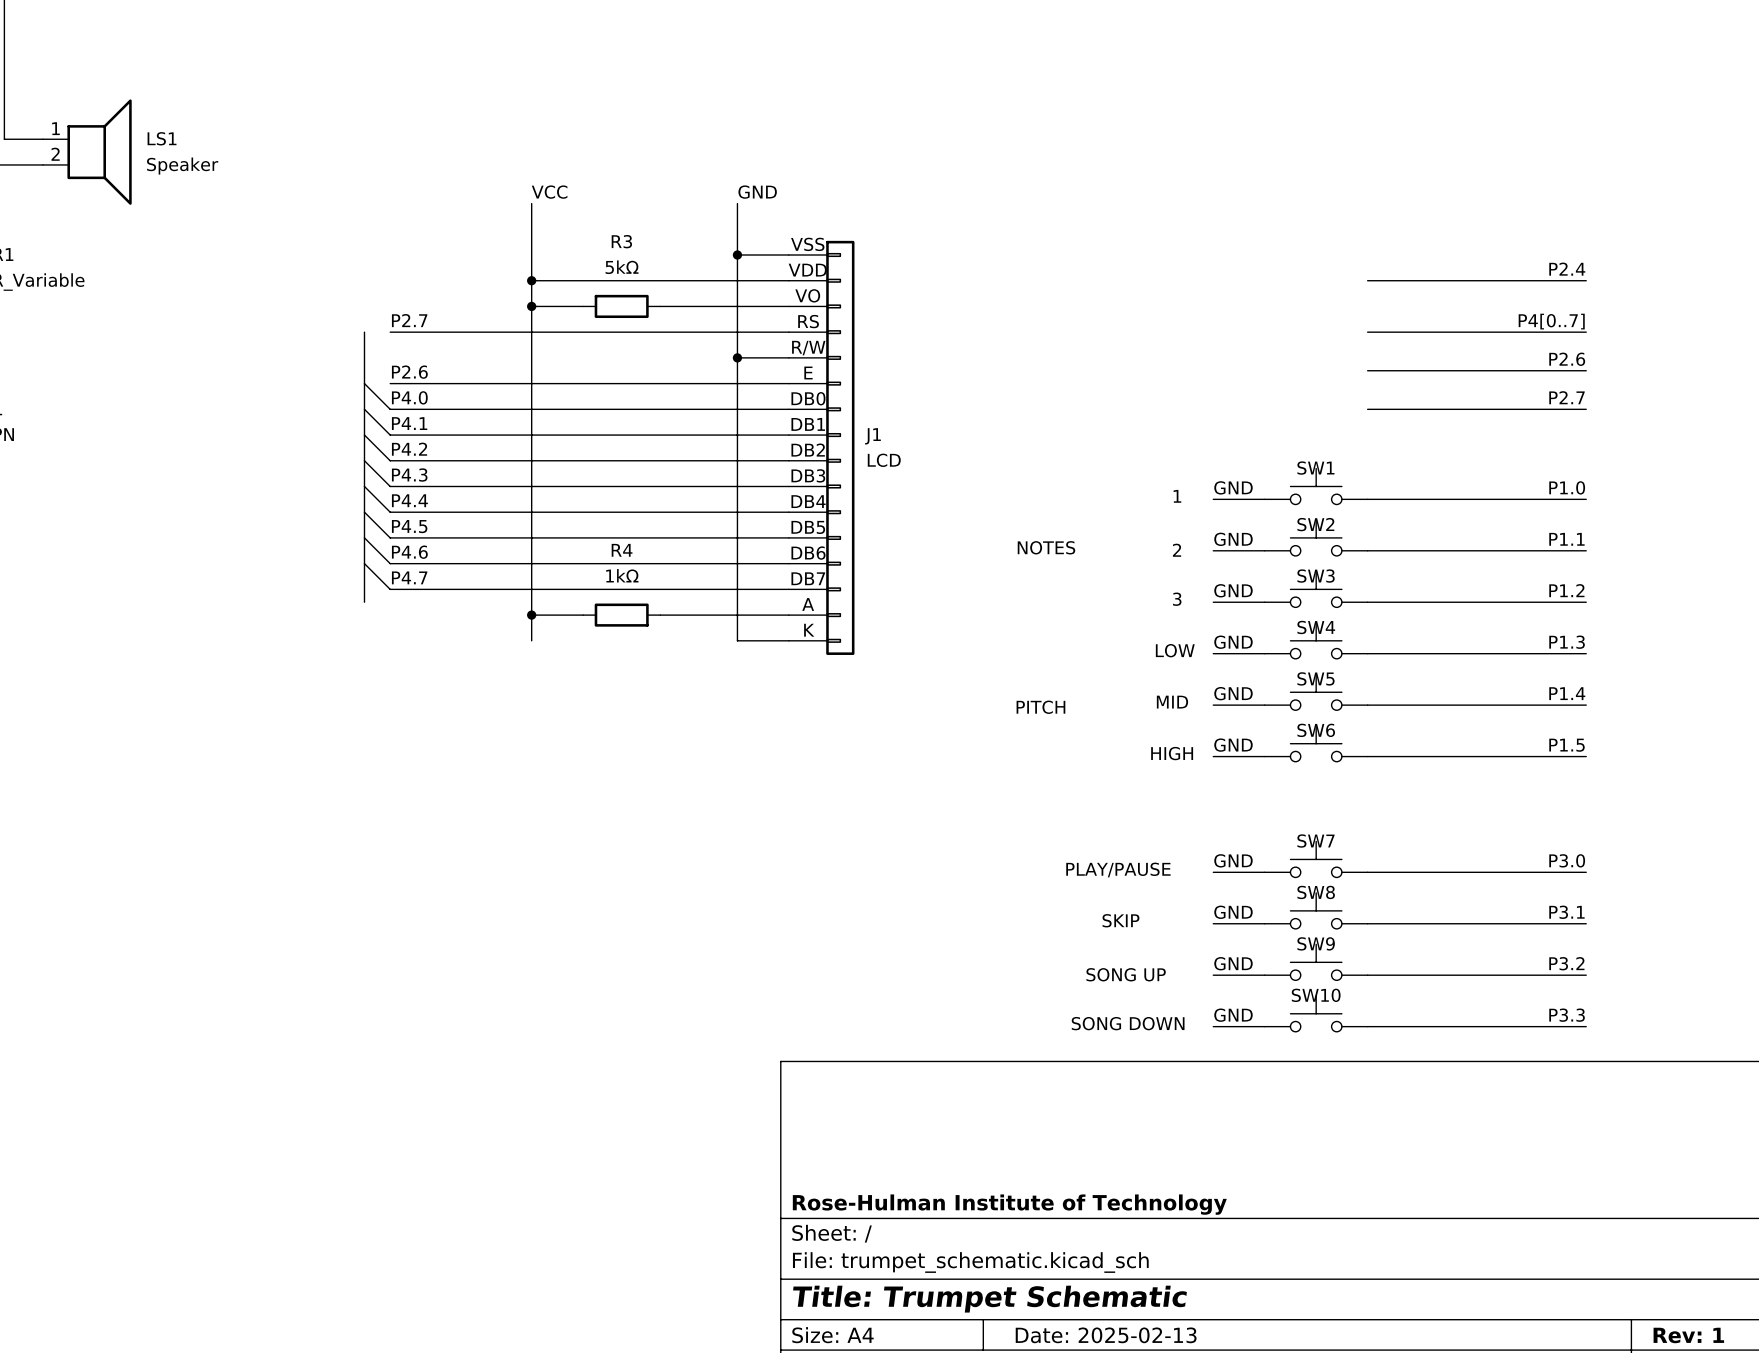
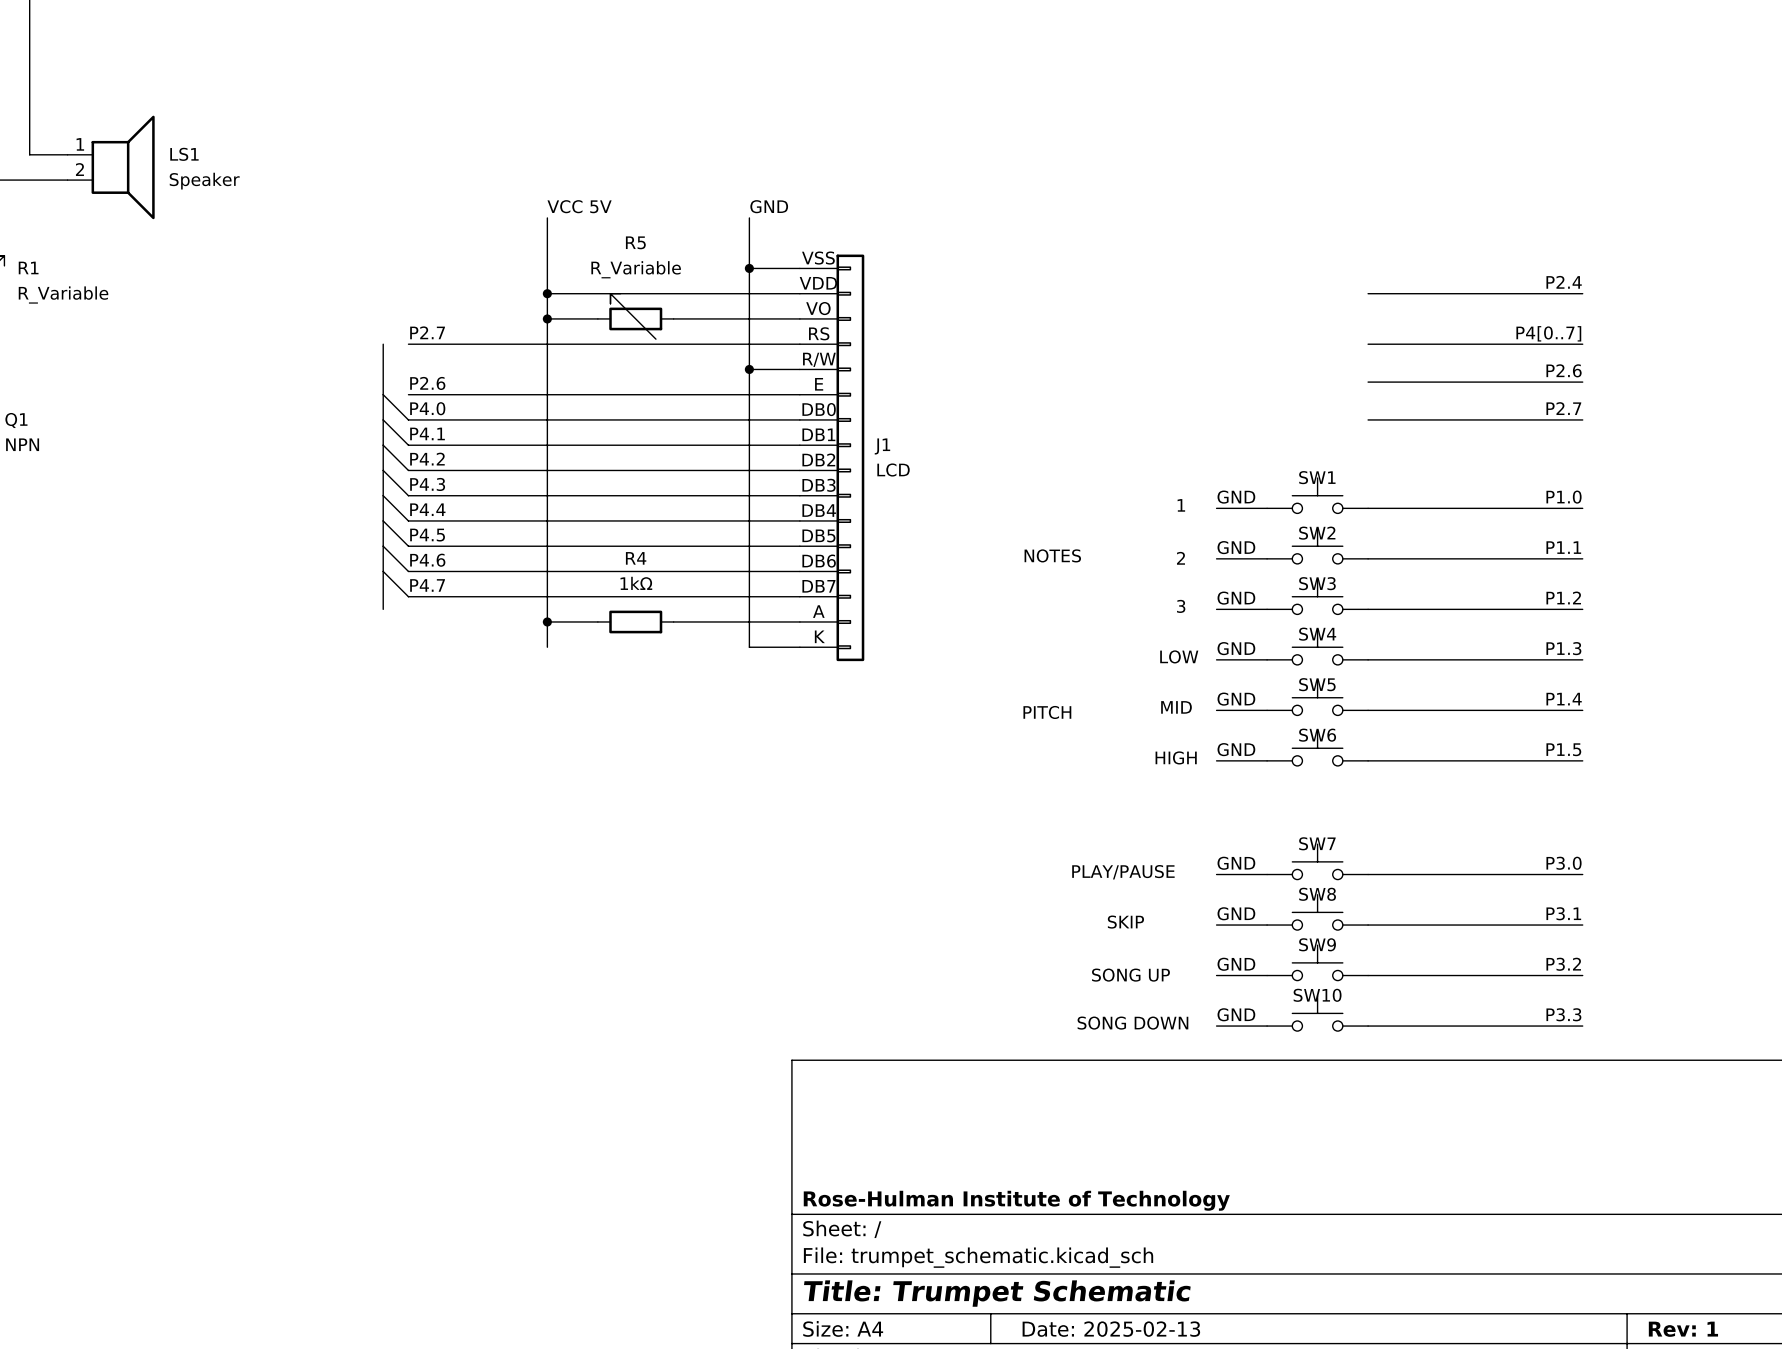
label: VCC (549, 192) -> VCC 5V (579, 206)
R5: none -> R_Variable (635, 316)
R3: 5kΩ (621, 306) -> none

